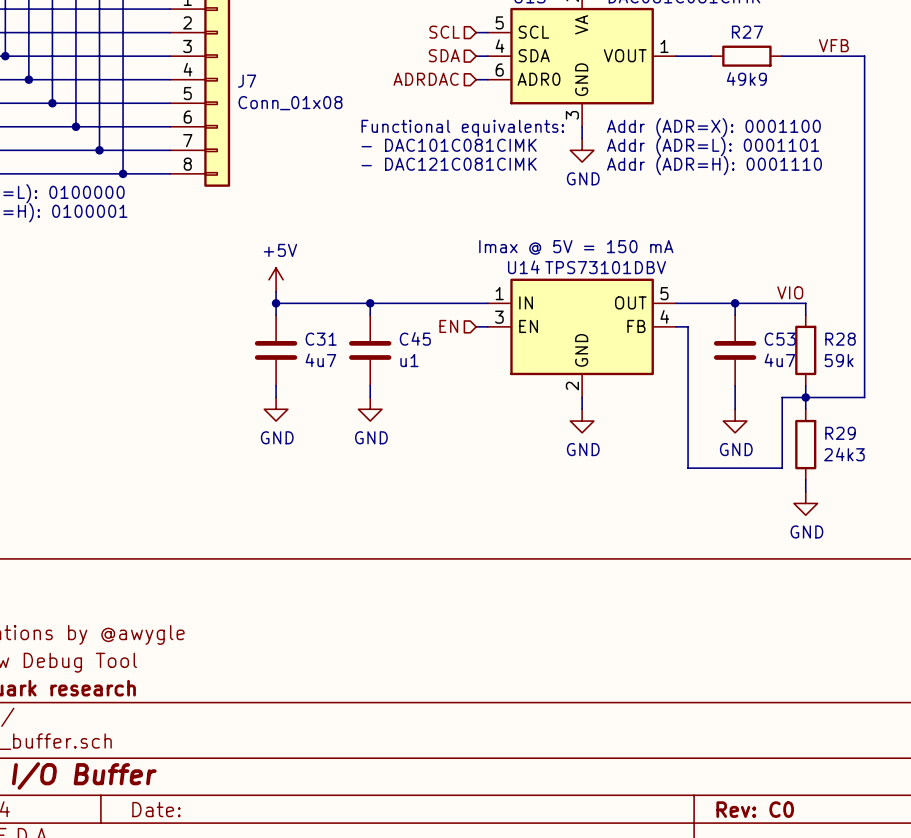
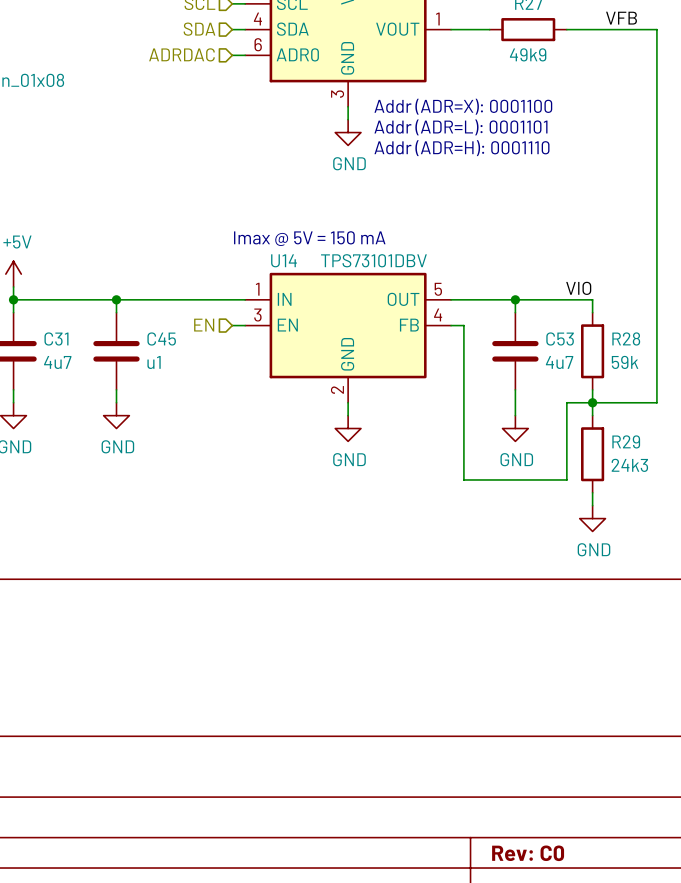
text: Functional equivalents: (462, 128) -> none
text: - DAC101C081CIMK (449, 145) -> none
text: - DAC121C081CIMK (449, 164) -> none

